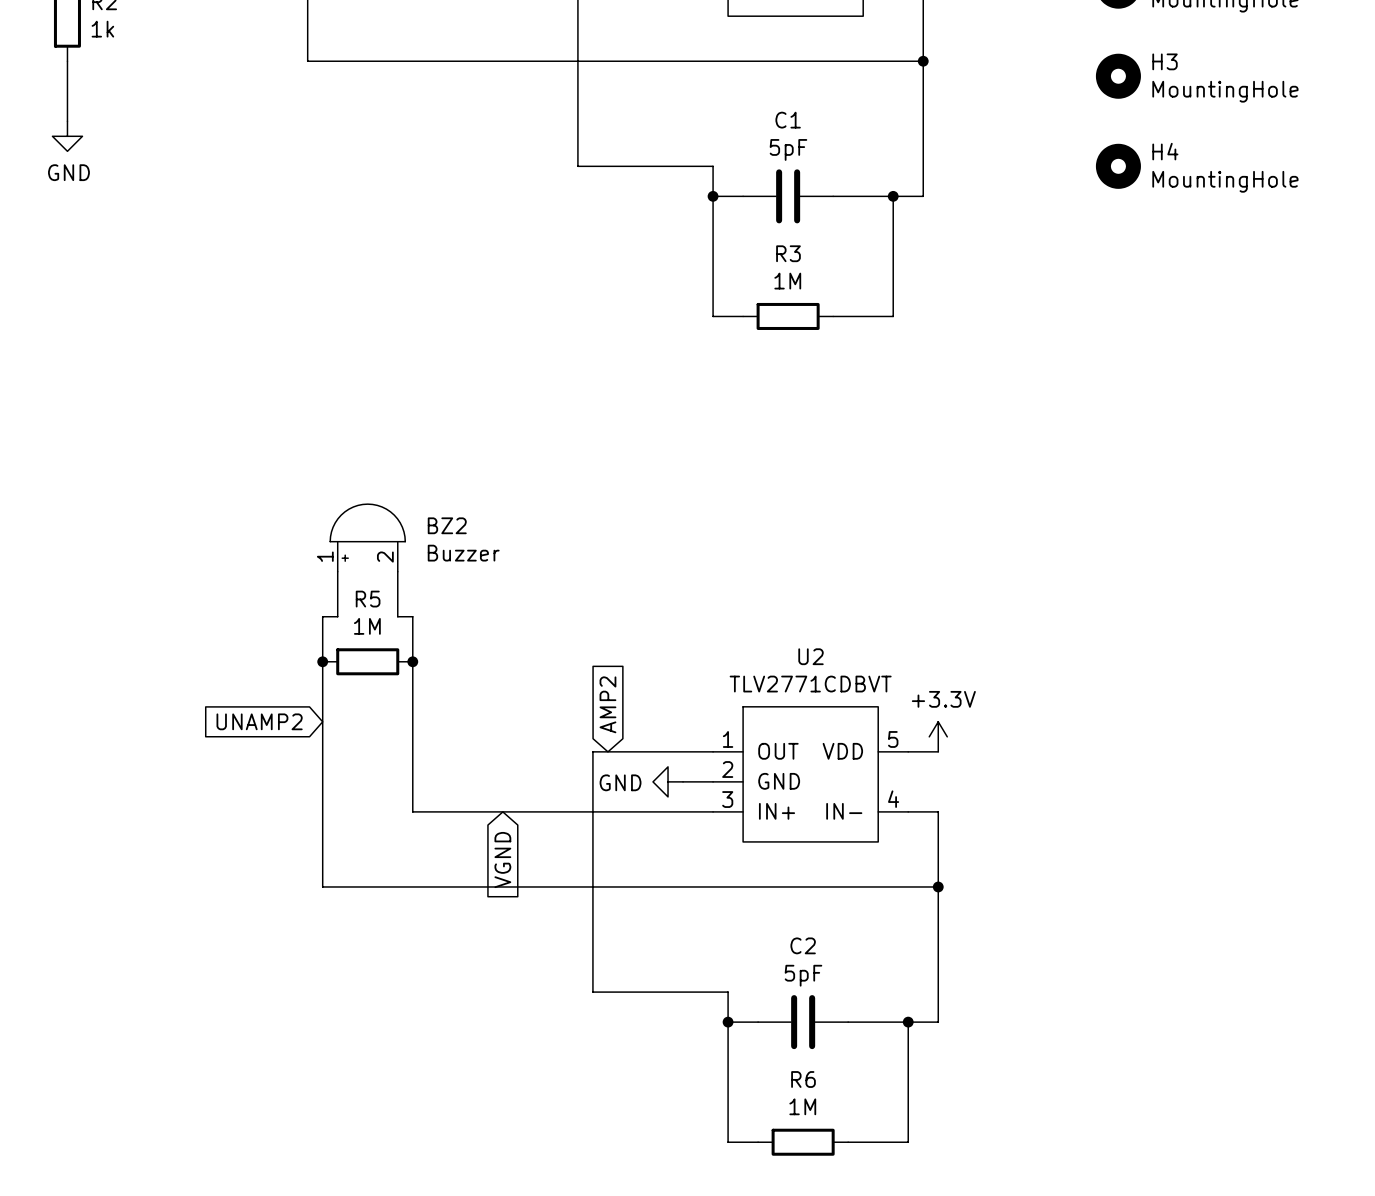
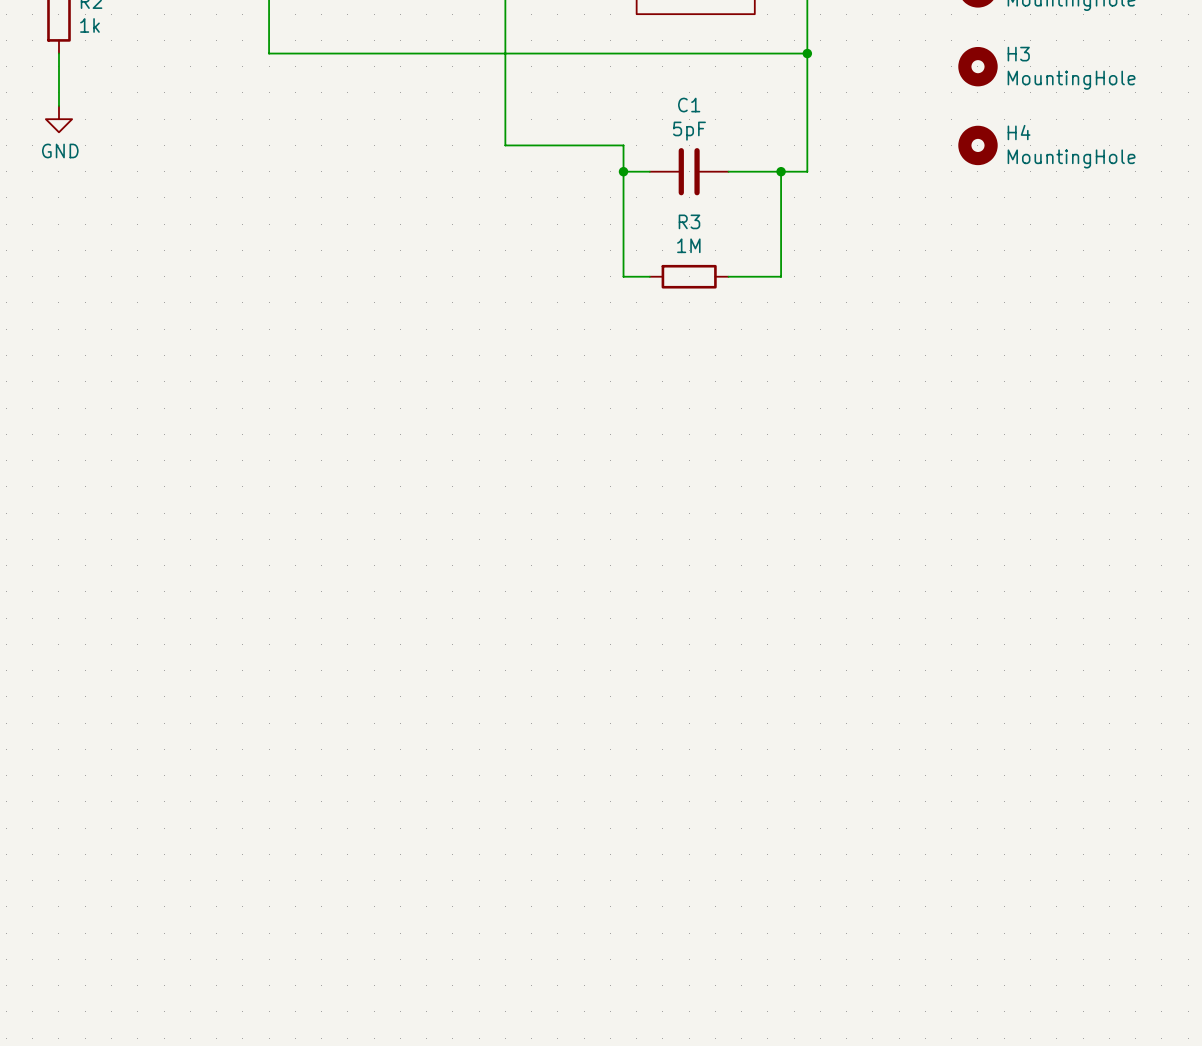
BZ2: Buzzer (367, 537) -> none
wire: (337, 571) (337, 616) (322, 616) (322, 886) (938, 886) -> none
wire: (397, 571) (397, 616) (412, 616) (412, 811) (713, 811) -> none
junction: (322, 661) -> none
R5: 1M (367, 661) -> none
junction: (412, 661) -> none
global label: AMP2 (607, 704) -> none
global label: UNAMP2 (259, 721) -> none
power symbol: +3.3V (938, 736) -> none
wire: (713, 751) (592, 751) (592, 992) (728, 992) (728, 1142) (758, 1142) -> none
wire: (908, 751) (938, 751) -> none
U2: TLV2771CDBVT (810, 774) -> none
power symbol: GND (668, 781) -> none
wire: (683, 781) (713, 781) -> none
wire: (908, 811) (938, 811) (938, 1022) (848, 1022) -> none
global label: VGND (502, 860) -> none
junction: (938, 886) -> none
wire: (728, 1022) (758, 1022) -> none
junction: (728, 1022) -> none
C2: 5pF (803, 1022) -> none
wire: (908, 1022) (908, 1142) (848, 1142) -> none
junction: (908, 1022) -> none
R6: 1M (803, 1142) -> none

